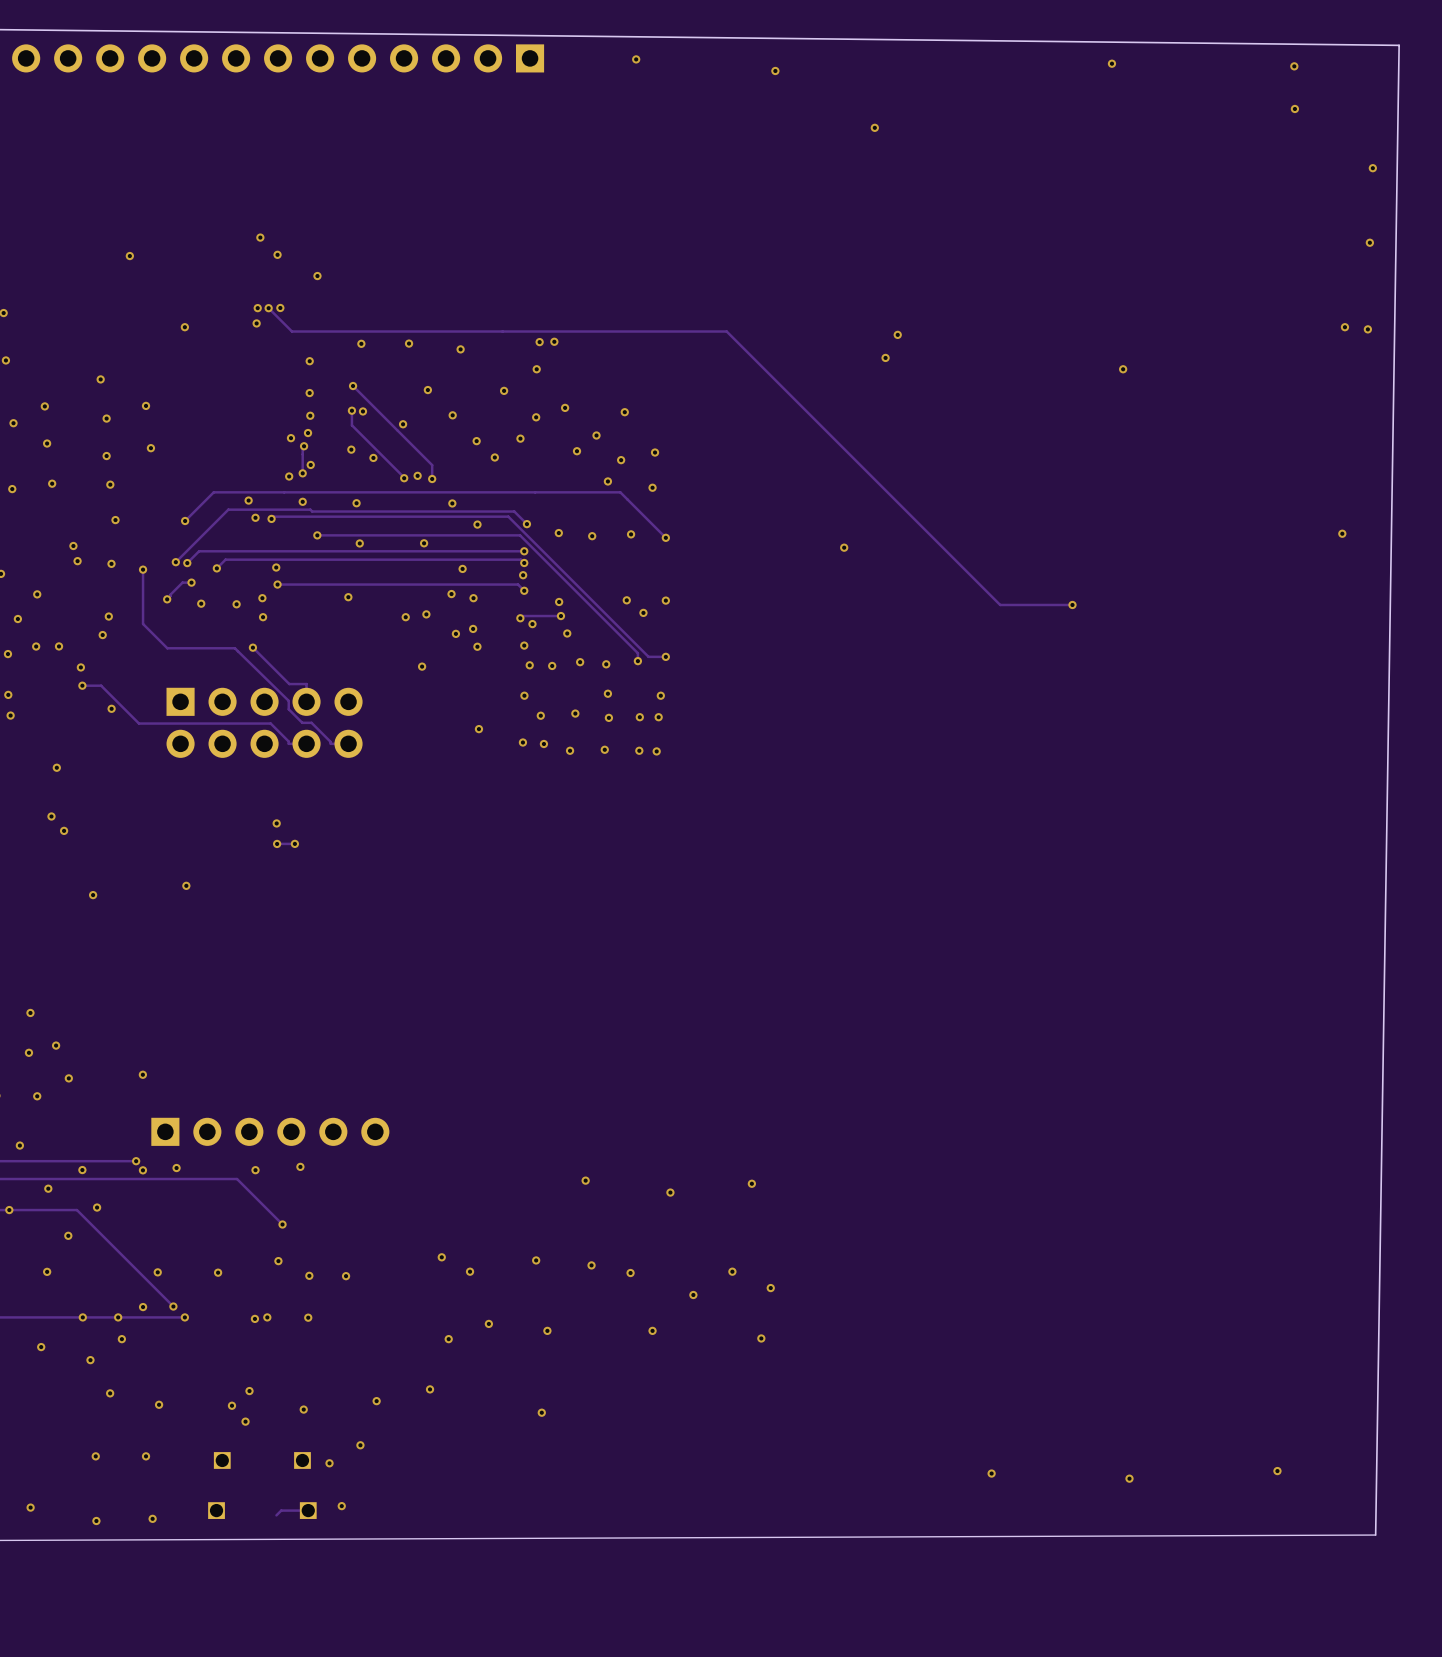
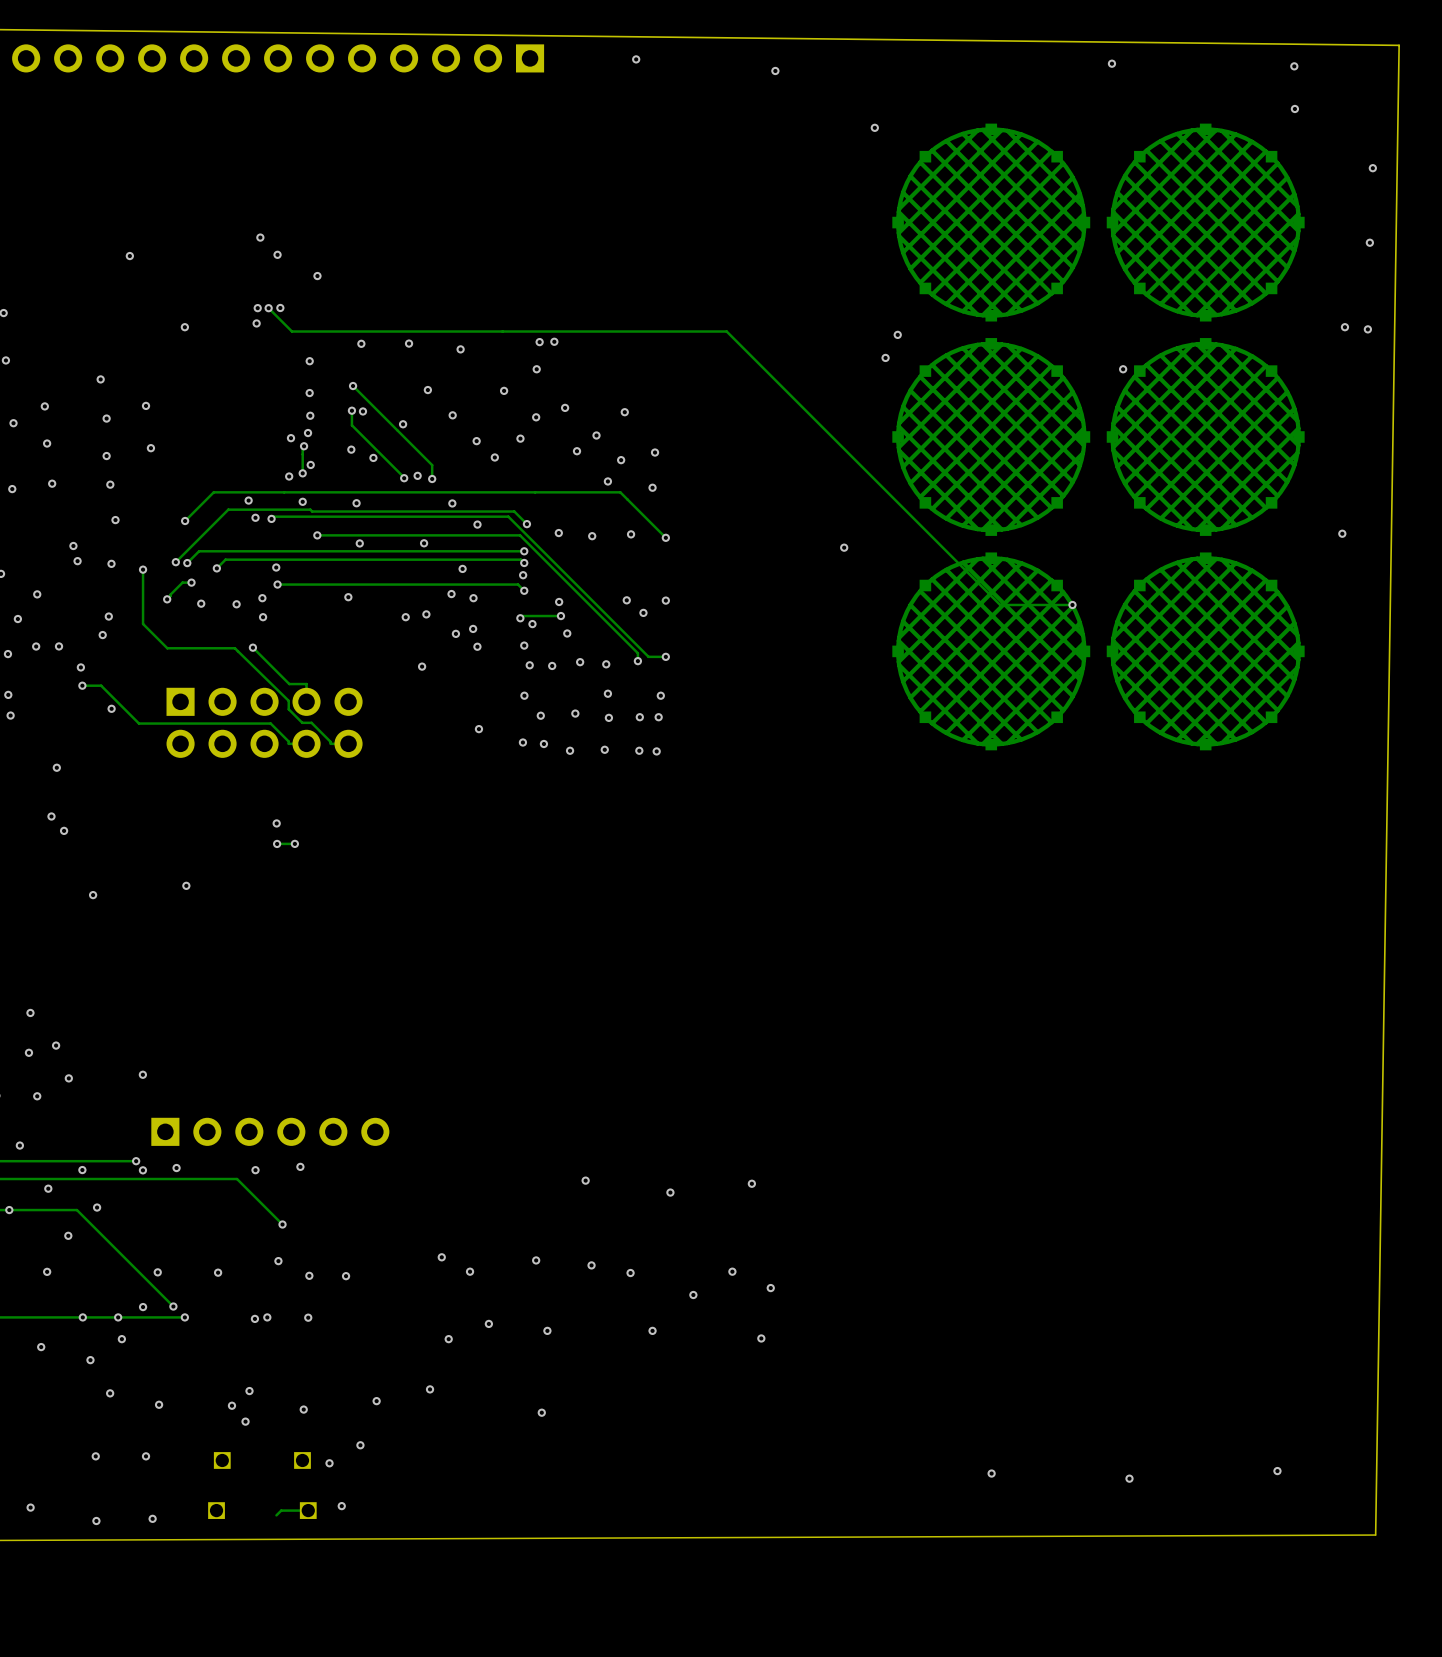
part: none -> (991, 222)
part: none -> (1205, 222)
part: none -> (991, 436)
part: none -> (1205, 436)
part: none -> (991, 651)
part: none -> (1205, 651)

